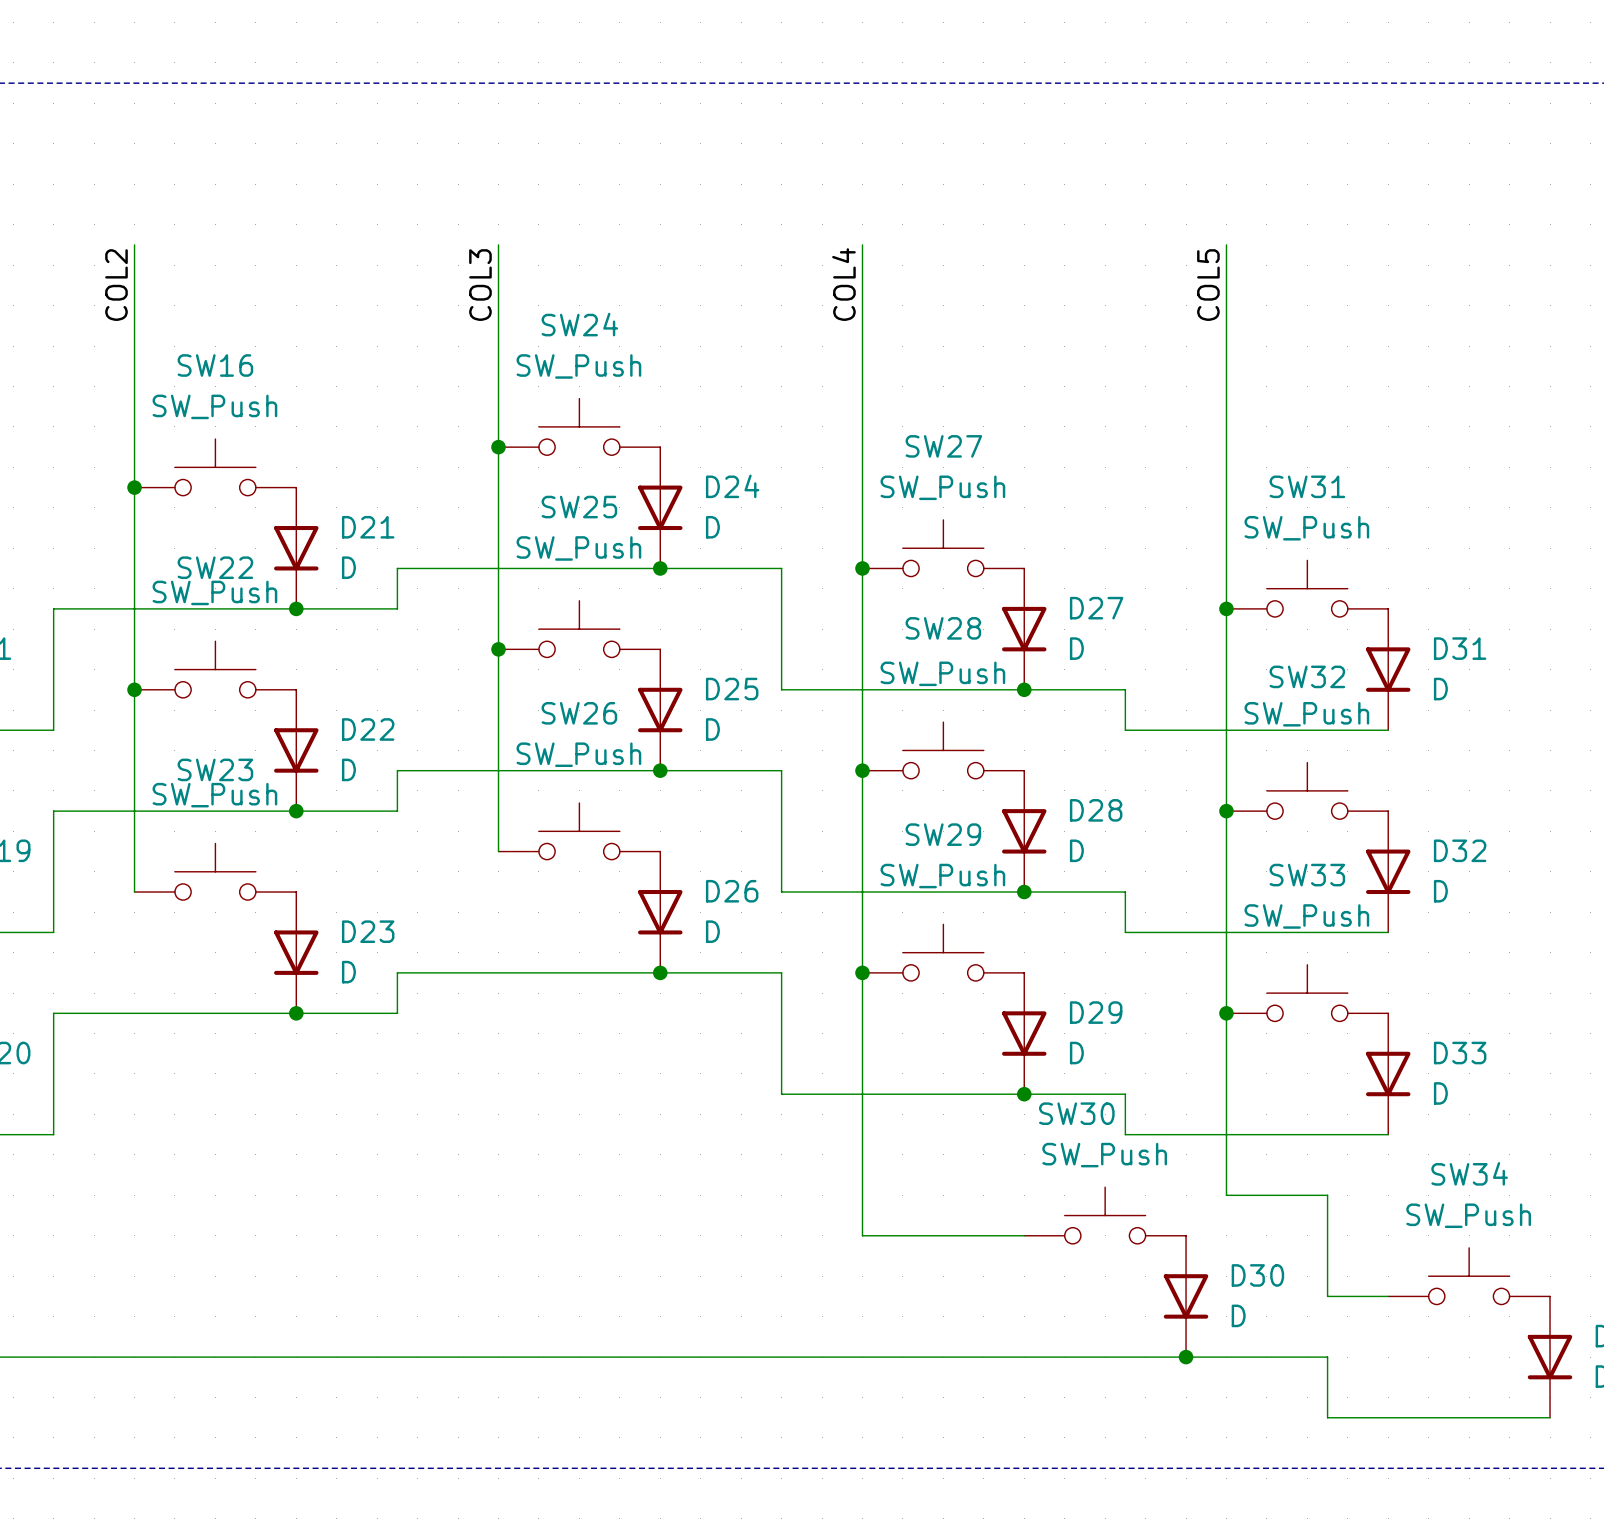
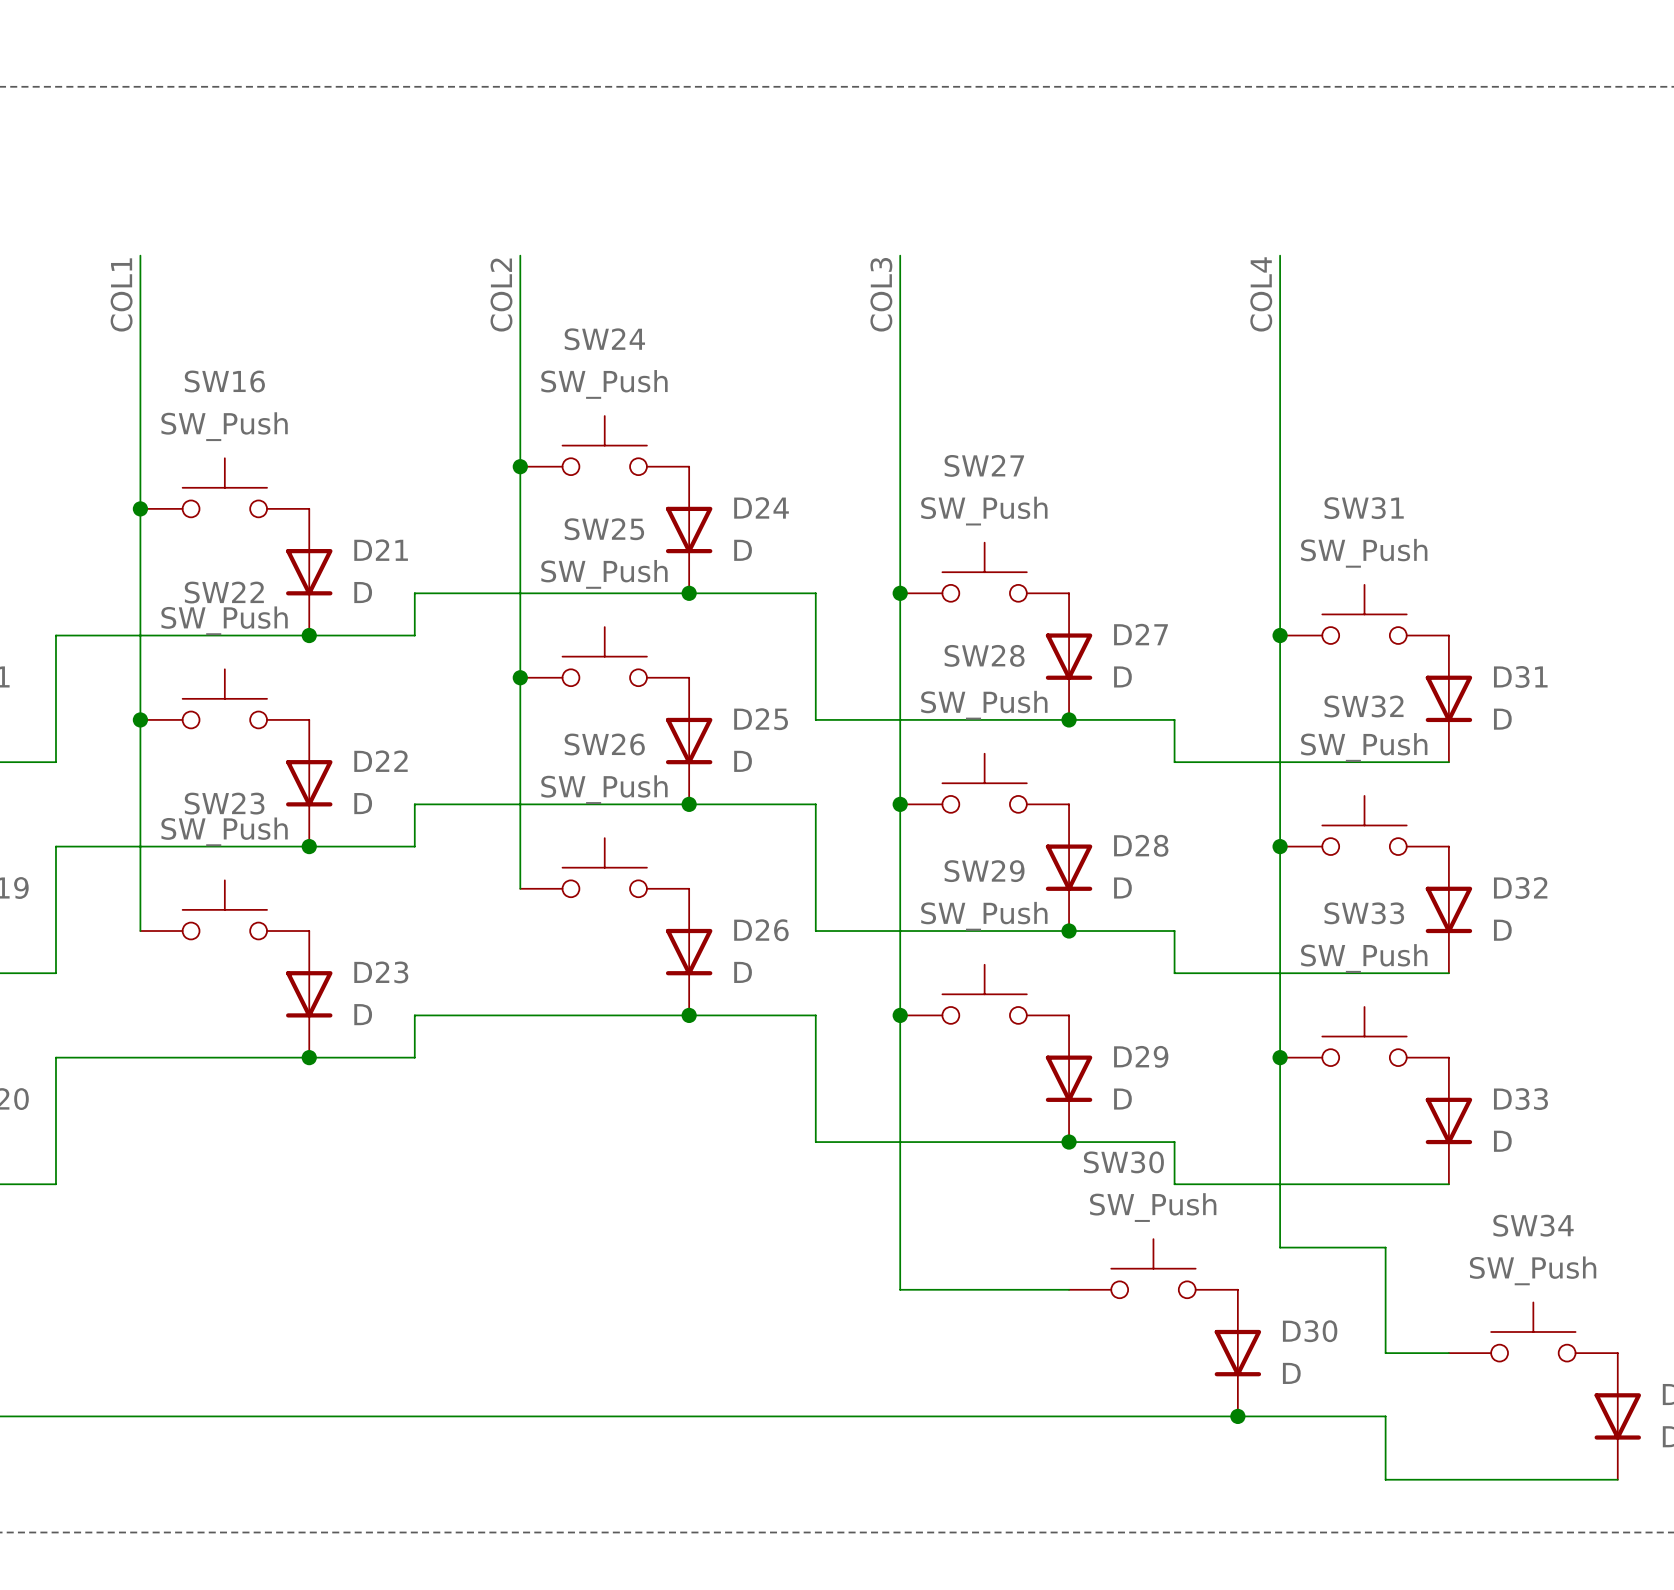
label: COL4 (843, 284) -> COL3 (881, 294)
label: COL2 (116, 285) -> COL1 (121, 294)
label: COL3 (480, 285) -> COL2 (501, 295)
label: COL5 (1208, 285) -> COL4 (1261, 294)

